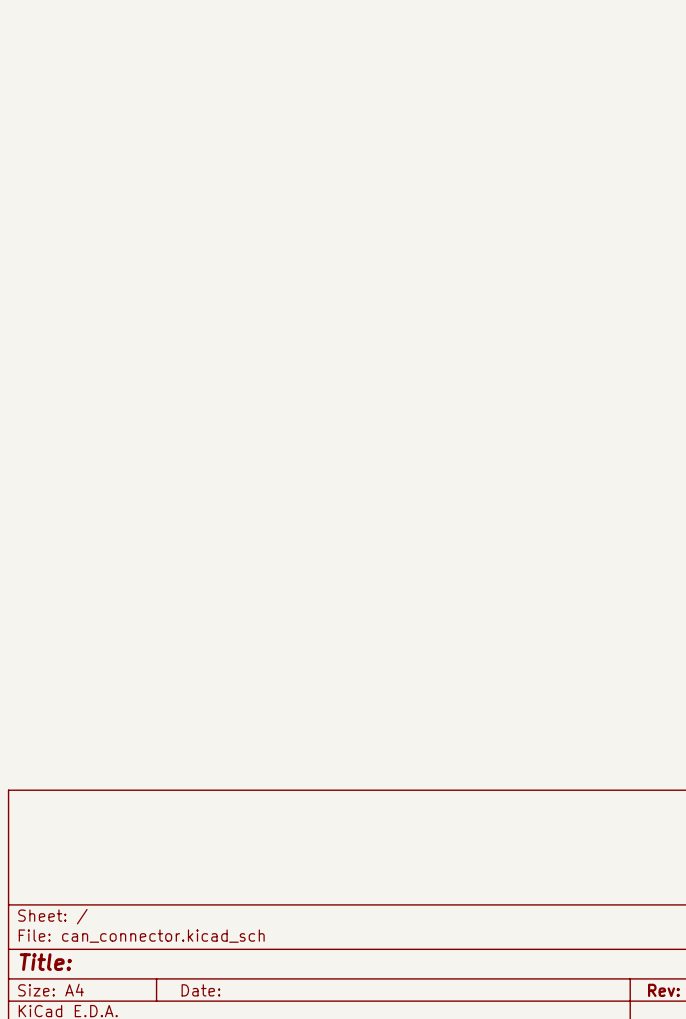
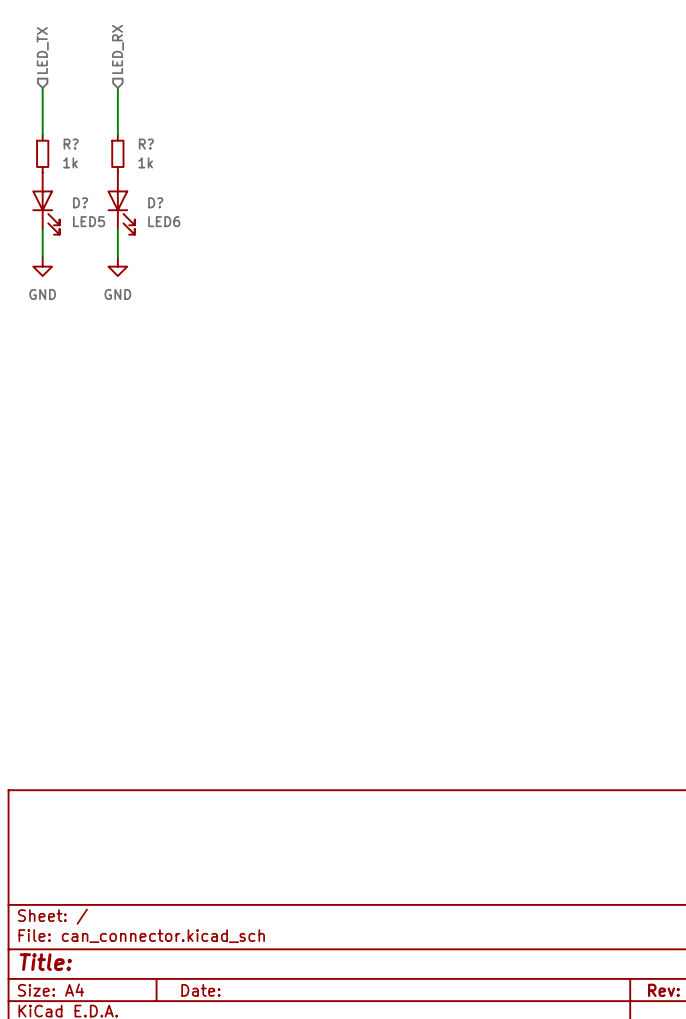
hierarchical label: none -> LED_RX (117, 49)
hierarchical label: none -> LED_TX (42, 50)
wire: none -> (42, 88) (42, 135)
wire: none -> (117, 88) (117, 135)
R?: none -> 1k (42, 153)
R?: none -> 1k (117, 153)
D?: none -> LED5 (45, 203)
D?: none -> LED6 (121, 203)
wire: none -> (42, 229) (42, 257)
wire: none -> (117, 229) (117, 257)
power symbol: none -> GND (42, 266)
power symbol: none -> GND (117, 266)

